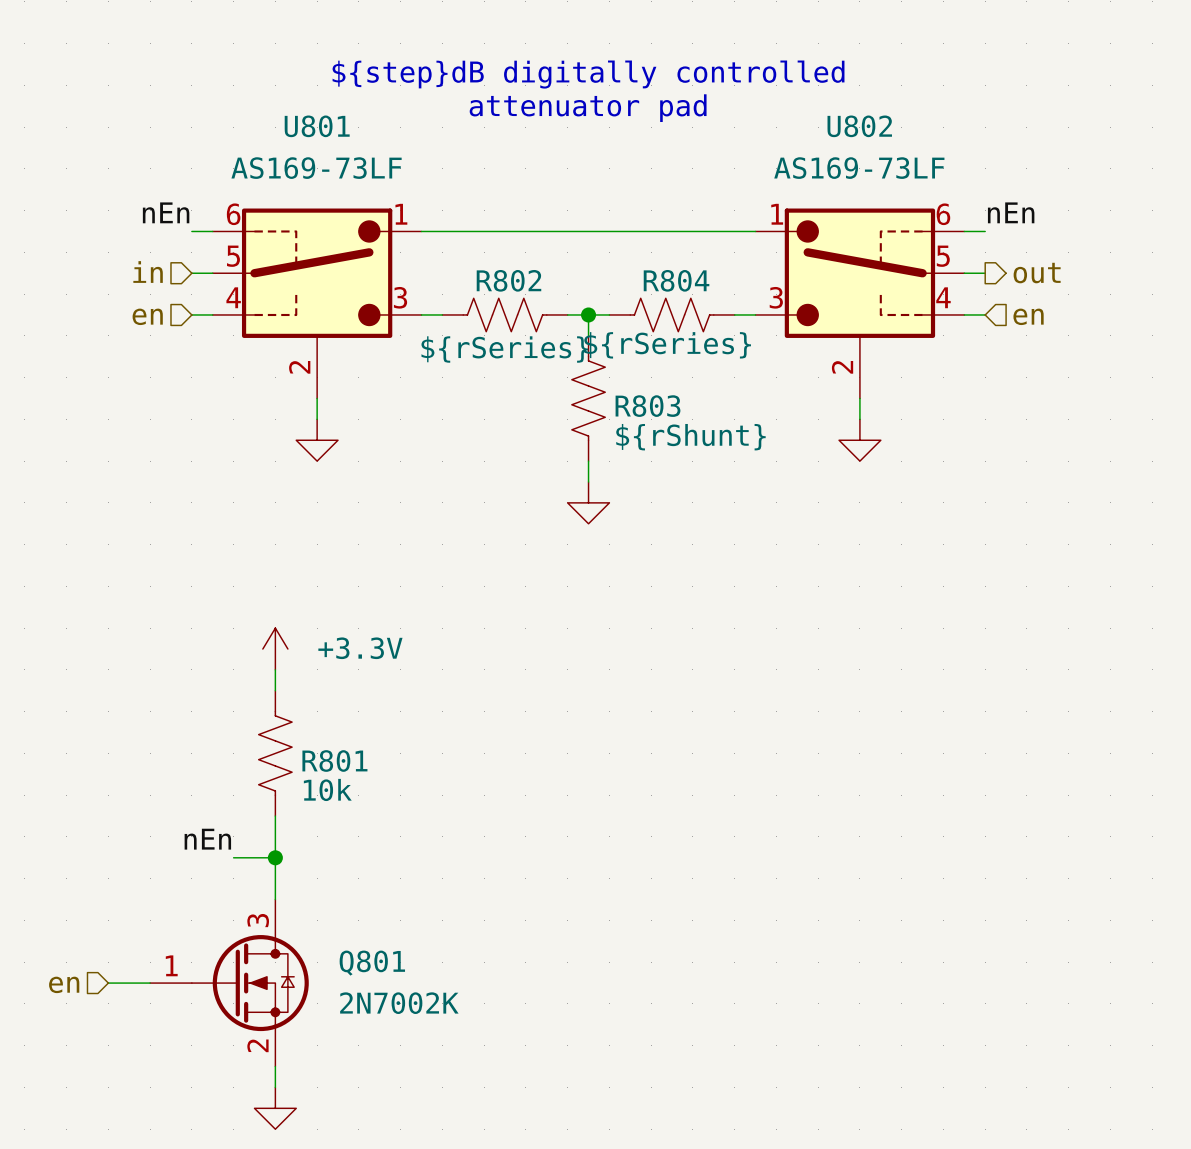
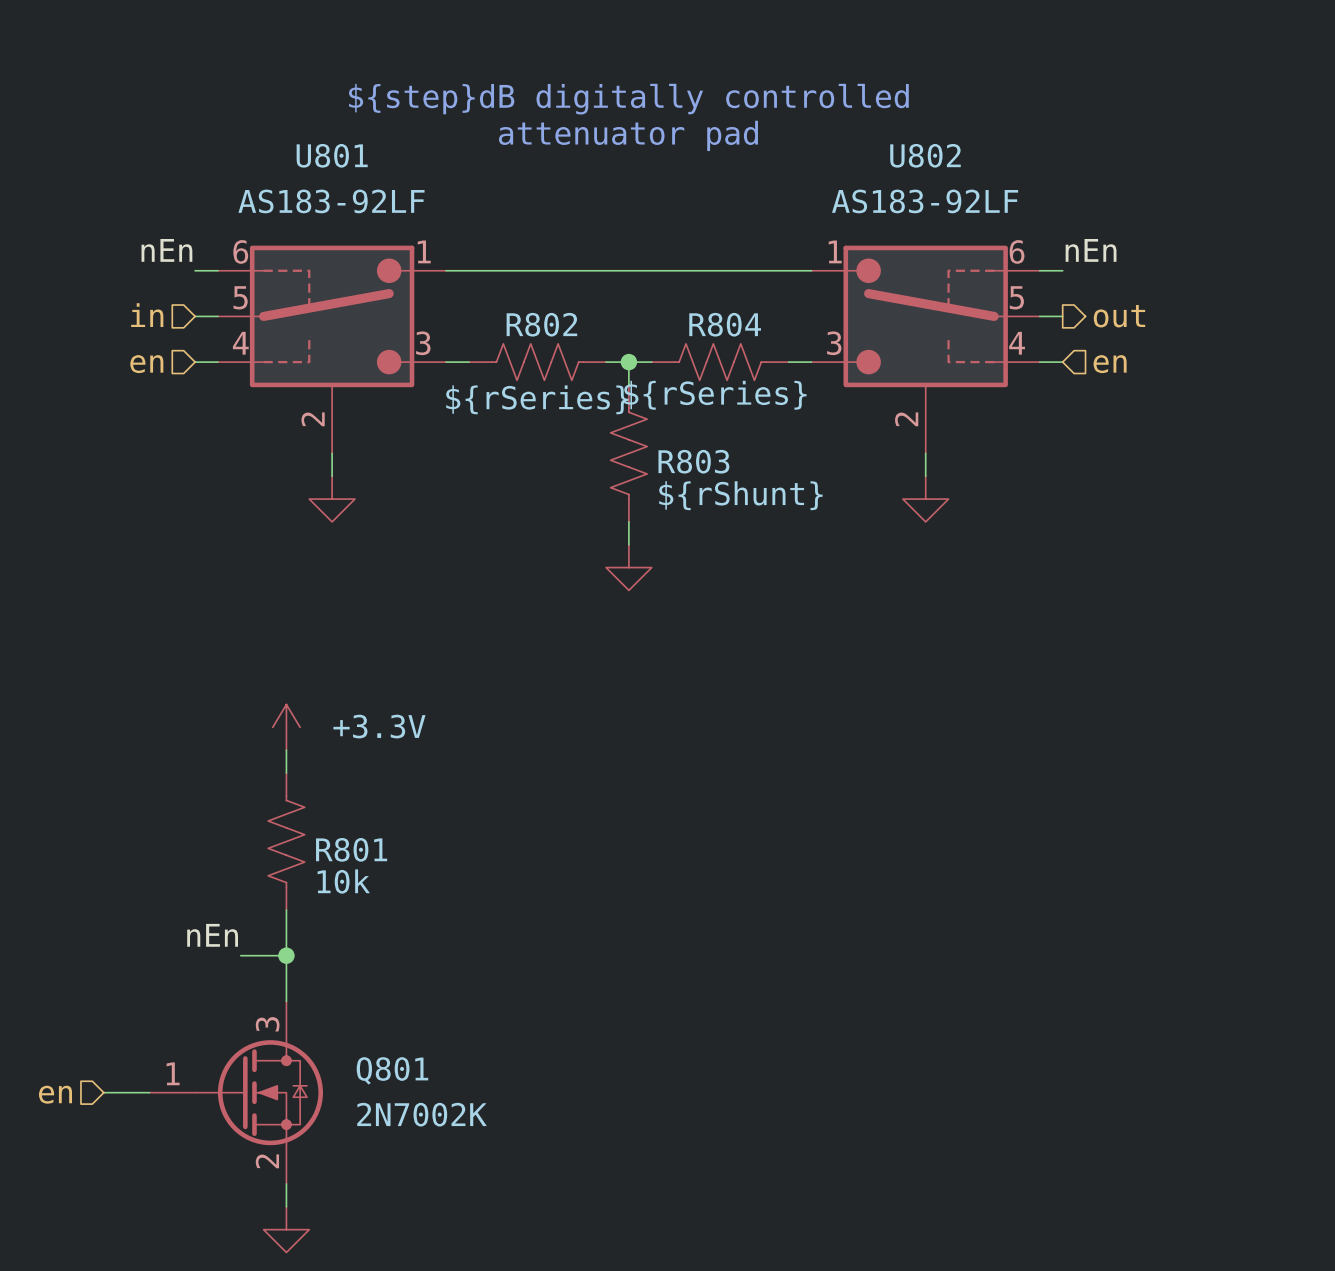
U801 value: AS169-73LF (316, 168) -> AS183-92LF (331, 201)
U802 value: AS169-73LF (859, 168) -> AS183-92LF (925, 201)

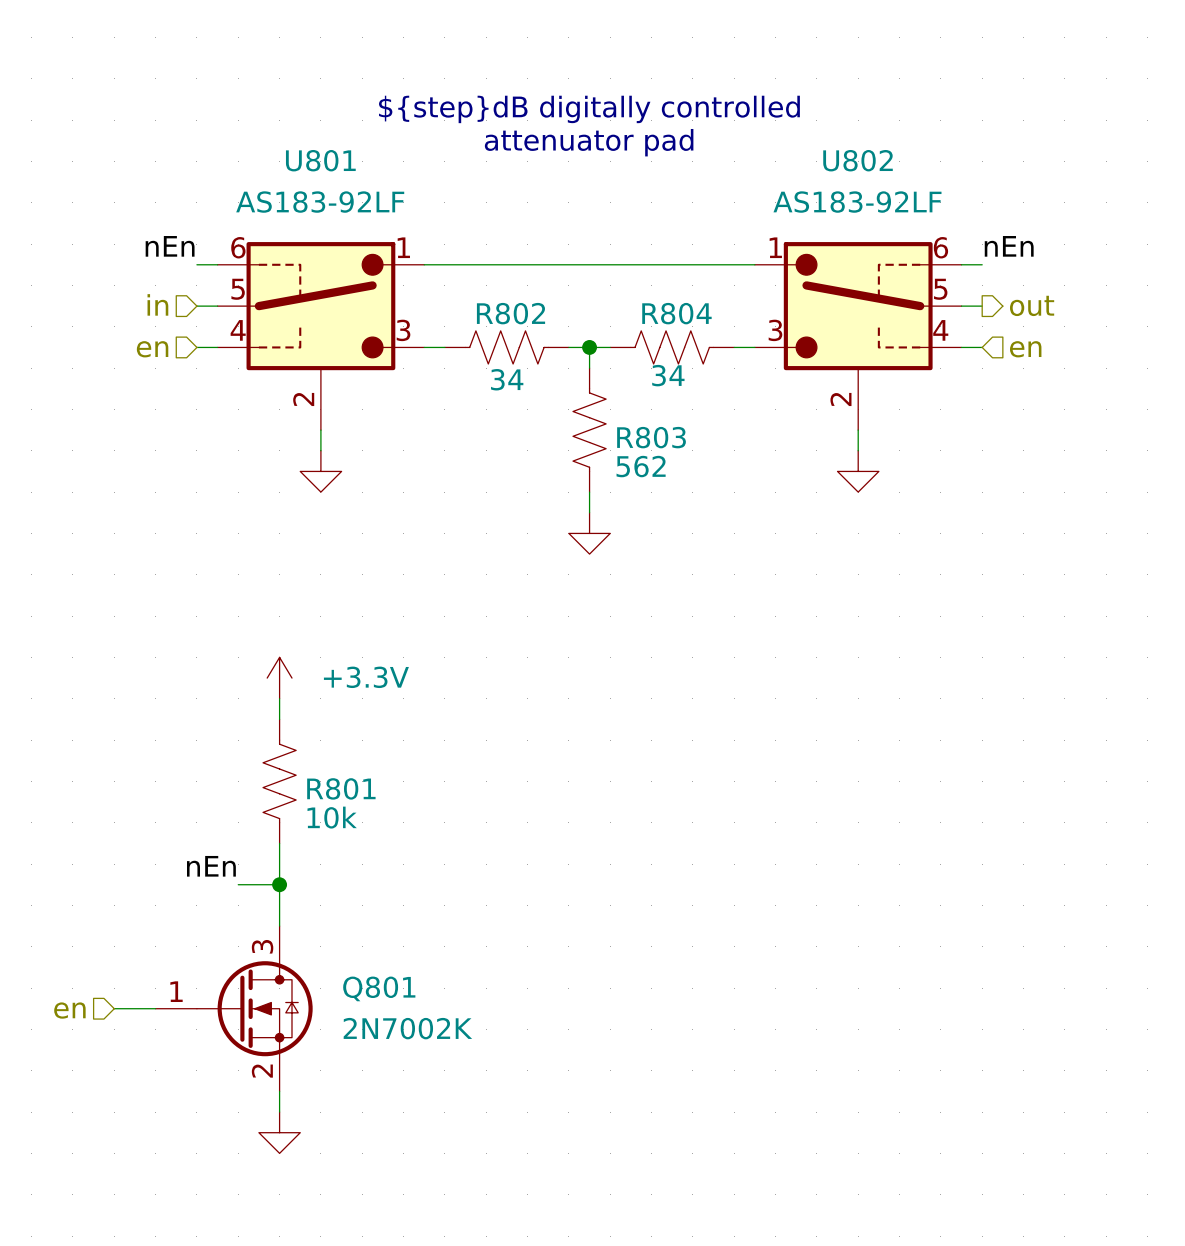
R804 value: ${rSeries} (715, 395) -> 34 (668, 375)
R802 value: ${rSeries} (537, 399) -> 34 (507, 379)
R803 value: ${rShunt} (740, 495) -> 562 (641, 466)

